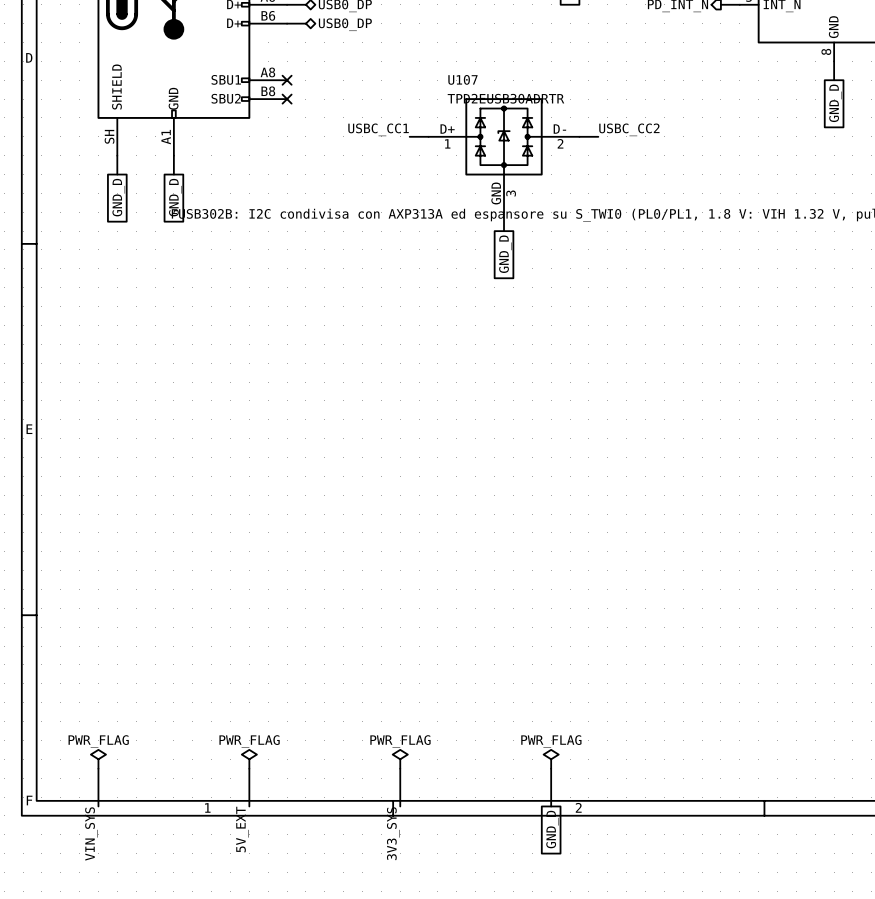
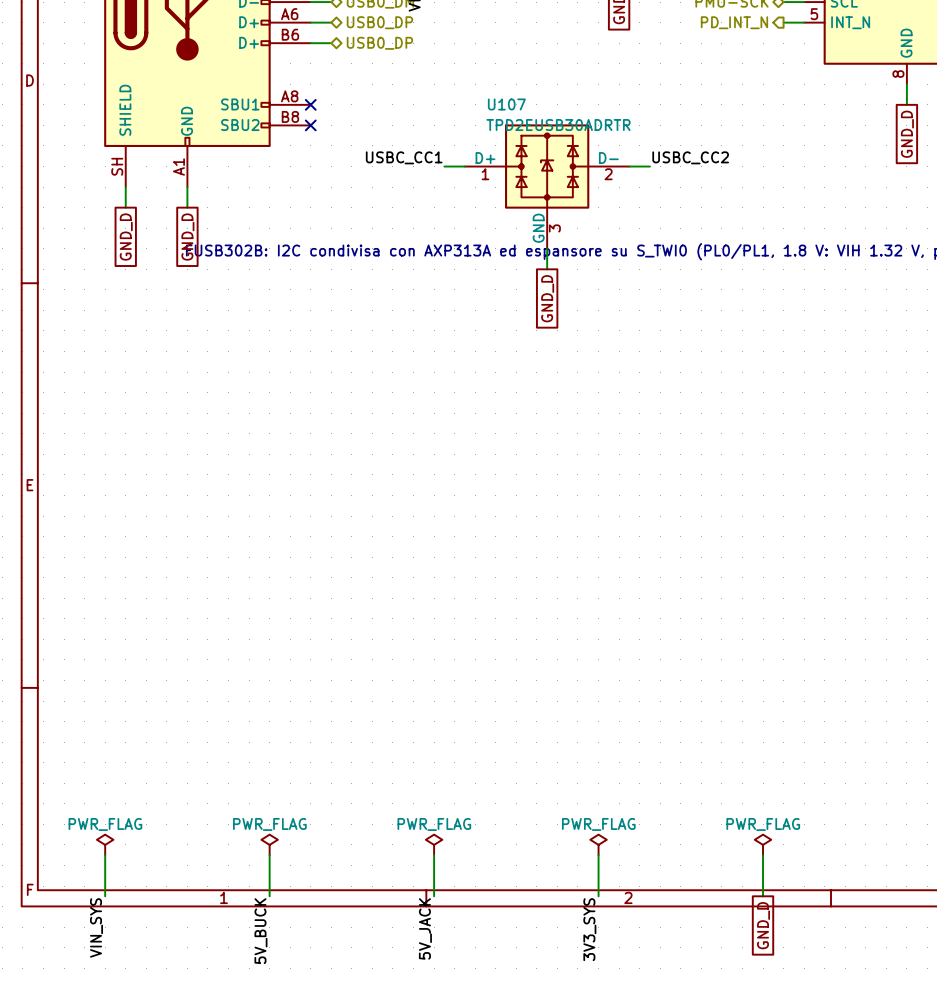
power symbol: none -> PWR_FLAG (763, 844)
wire: none -> (763, 855) (763, 896)
label: 5V_EXT (242, 829) -> 5V_BUCK (260, 931)
global label position: GND_D (552, 829) -> GND_D (763, 925)
label: 3V3_SYS (393, 833) -> 5V_JACK (425, 928)
label: none -> 3V3_SYS (589, 929)

